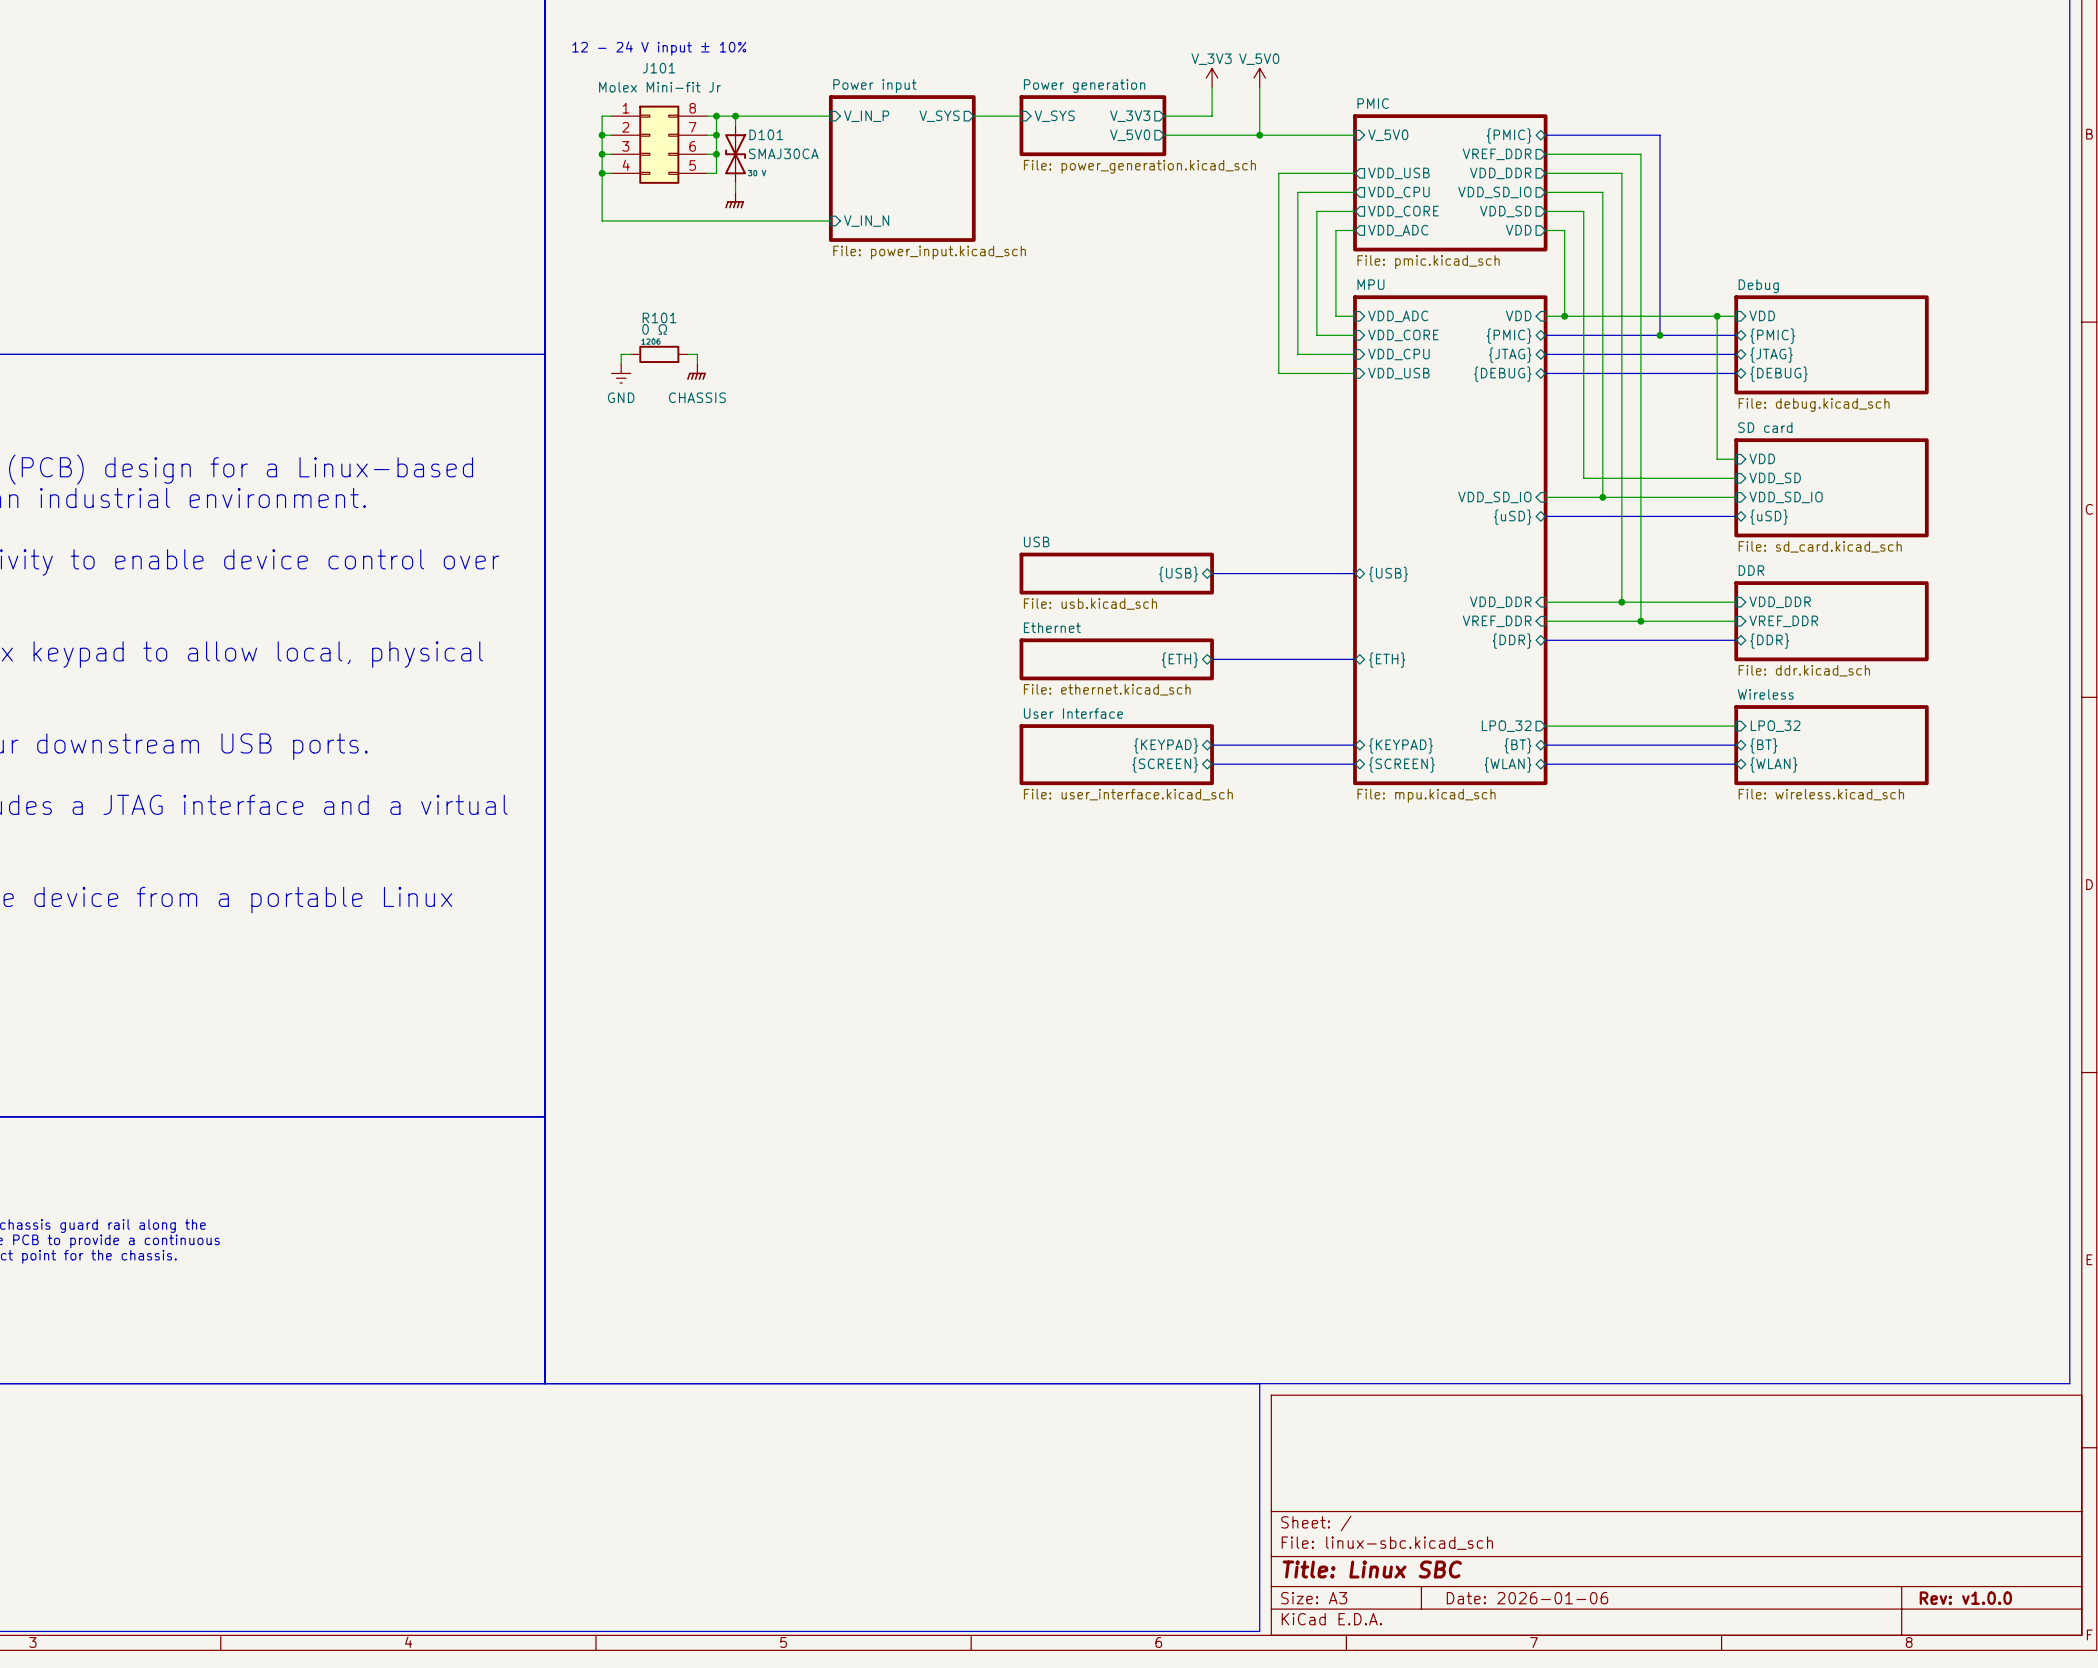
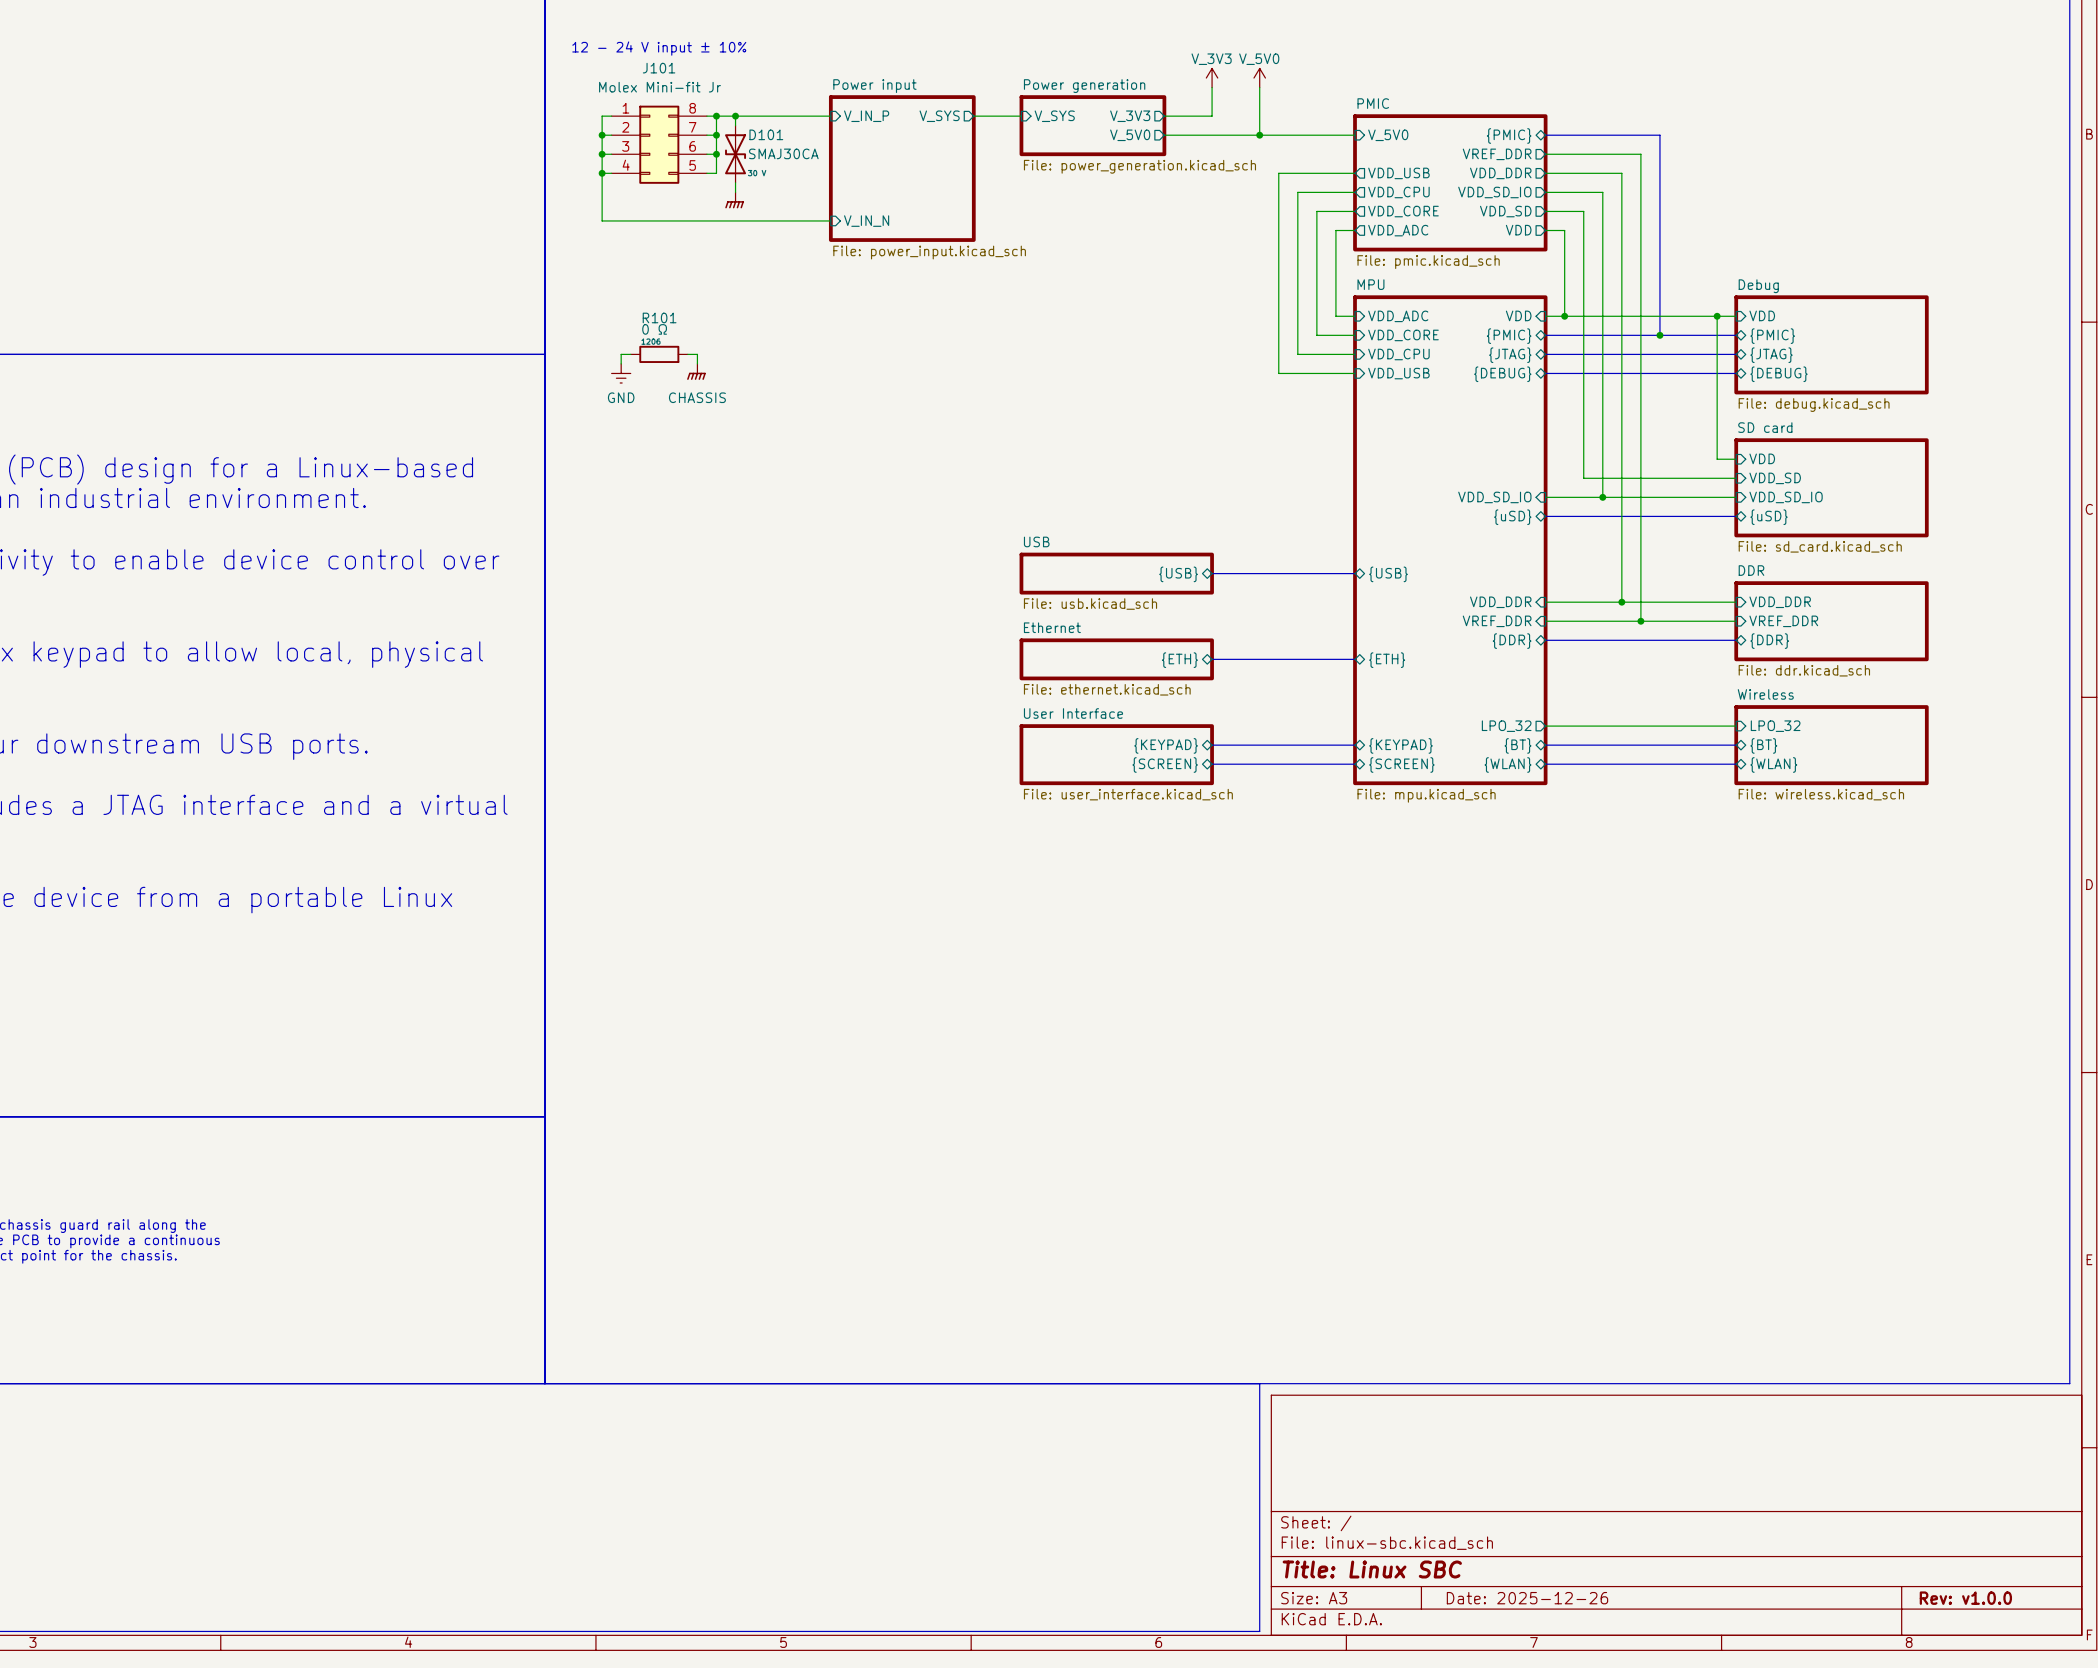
title block: Date: 2026-01-06 (1527, 1598) -> Date: 2025-12-26 (1527, 1598)

